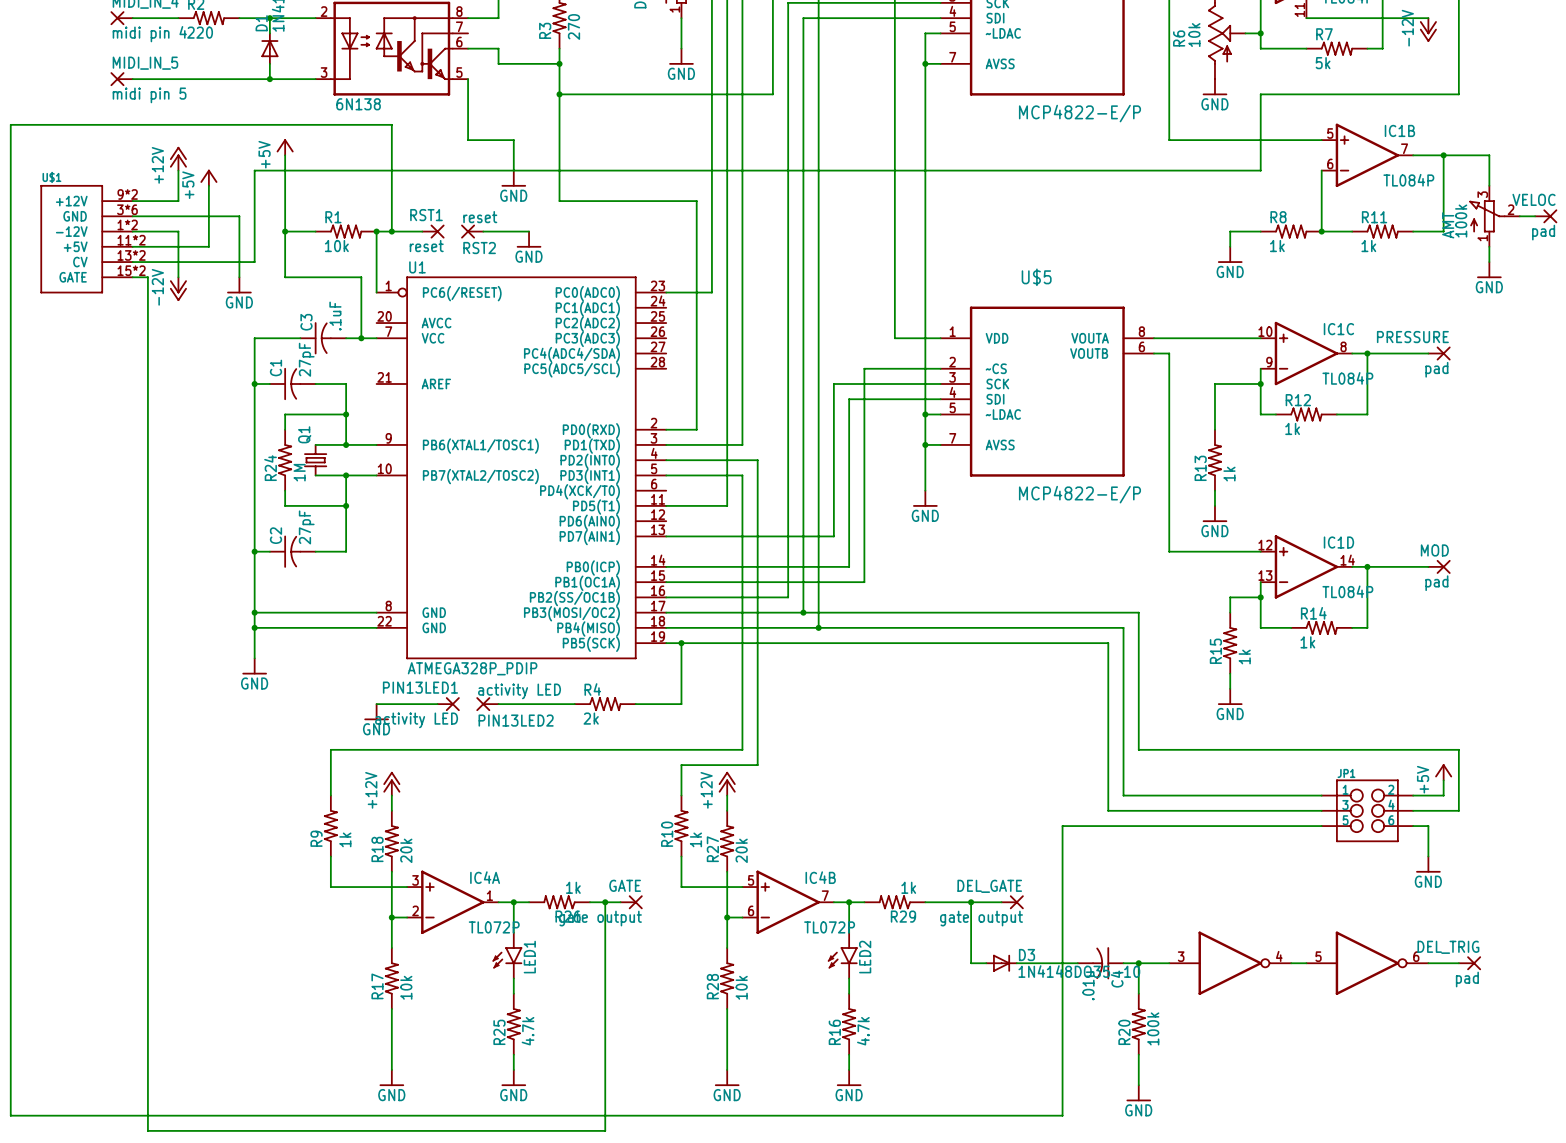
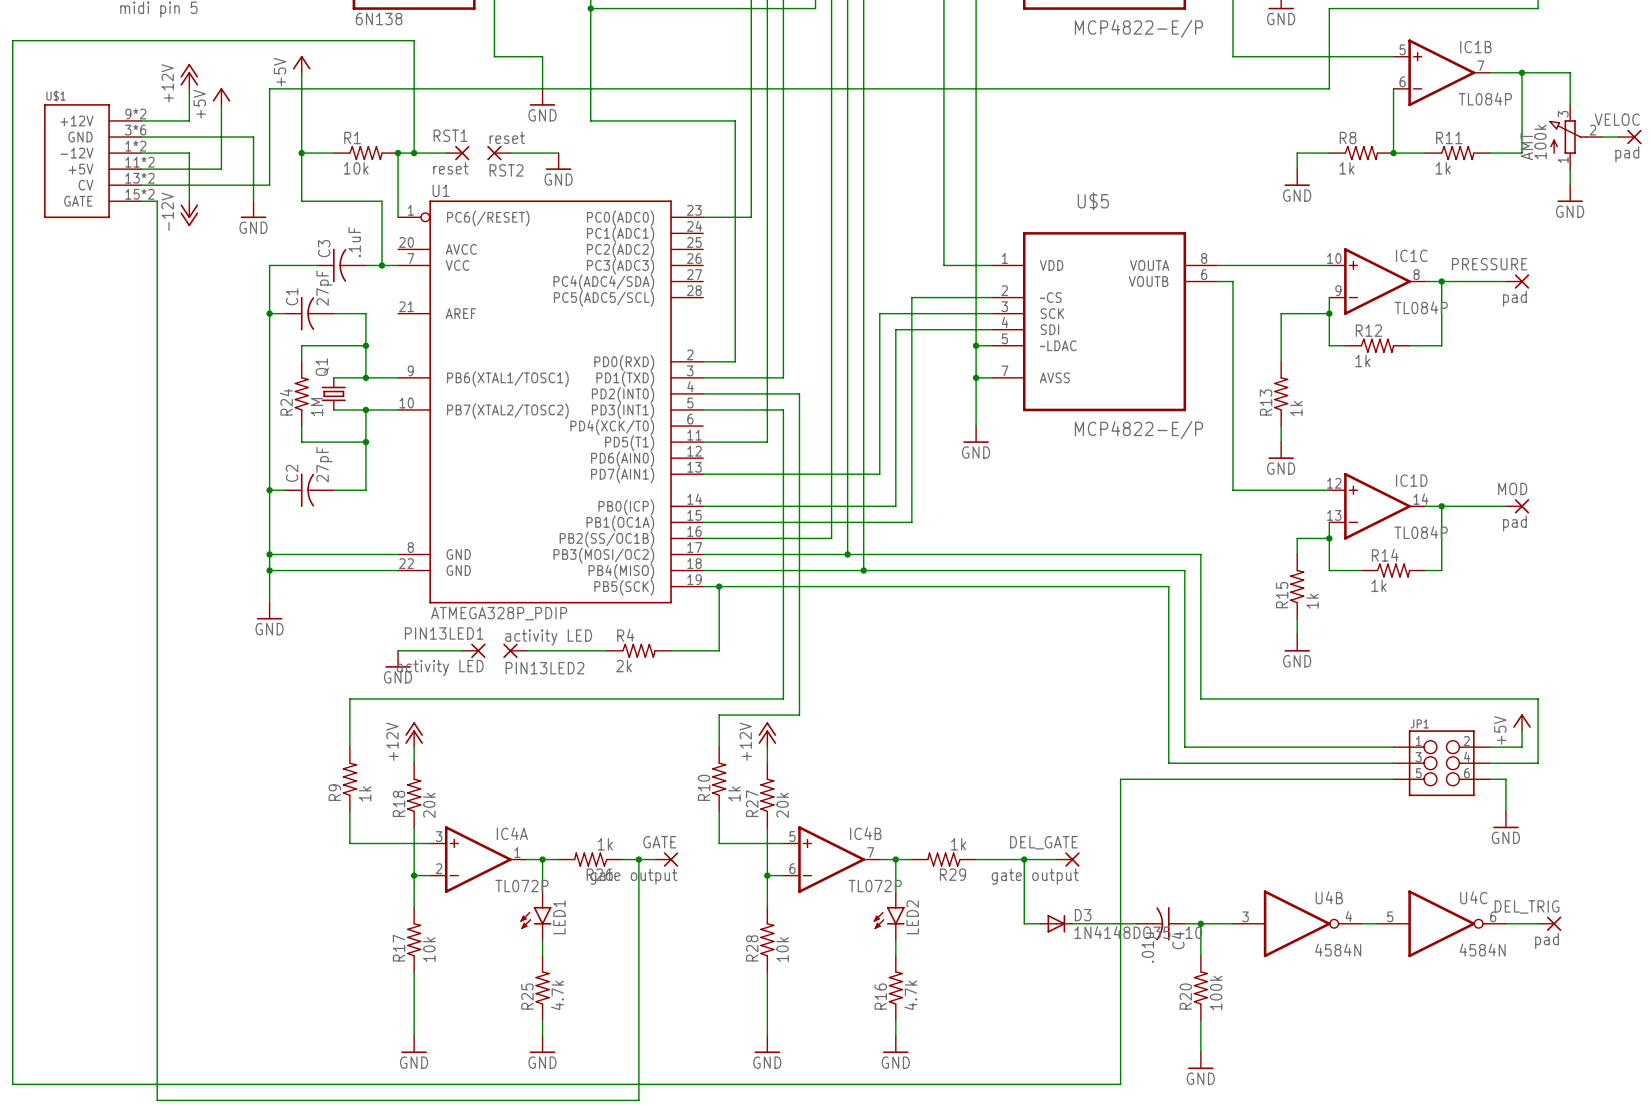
U4B name: none -> U4B (1329, 897)
U4C name: none -> U4C (1473, 897)
U4B value: none -> 4584N (1338, 950)
U4C value: none -> 4584N (1482, 950)

